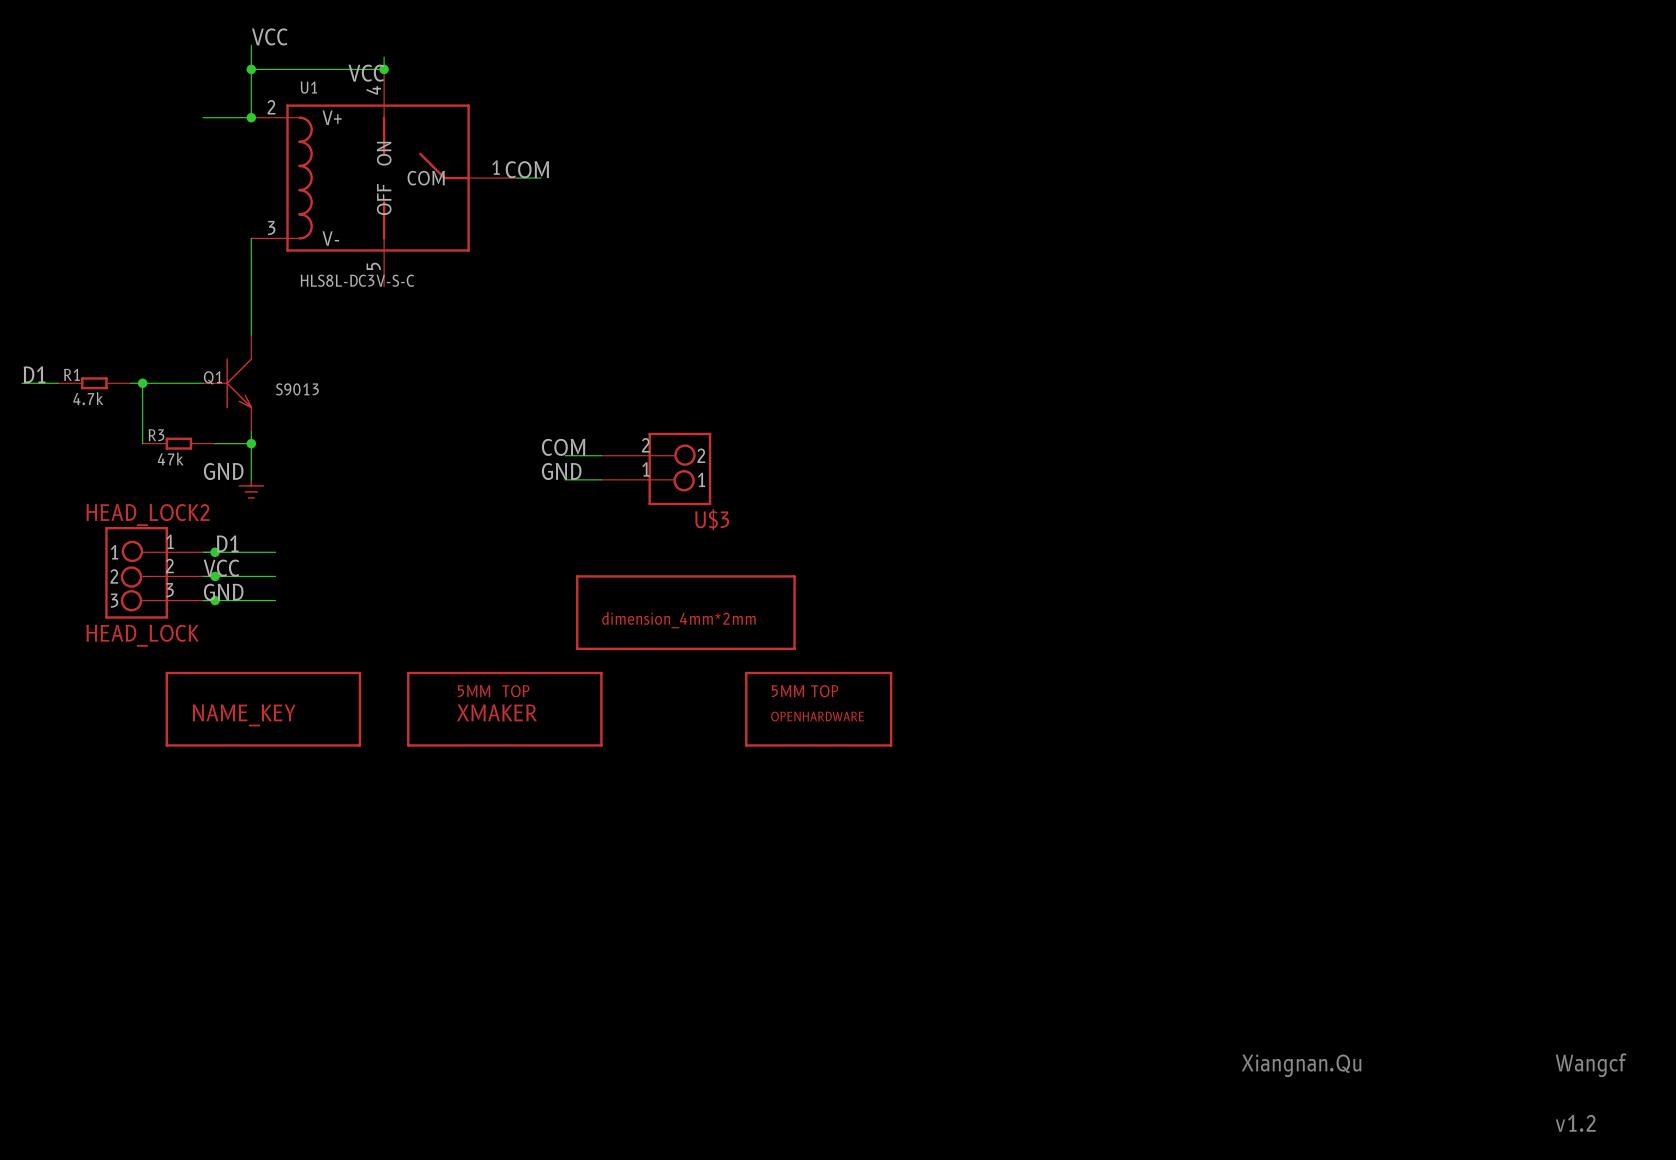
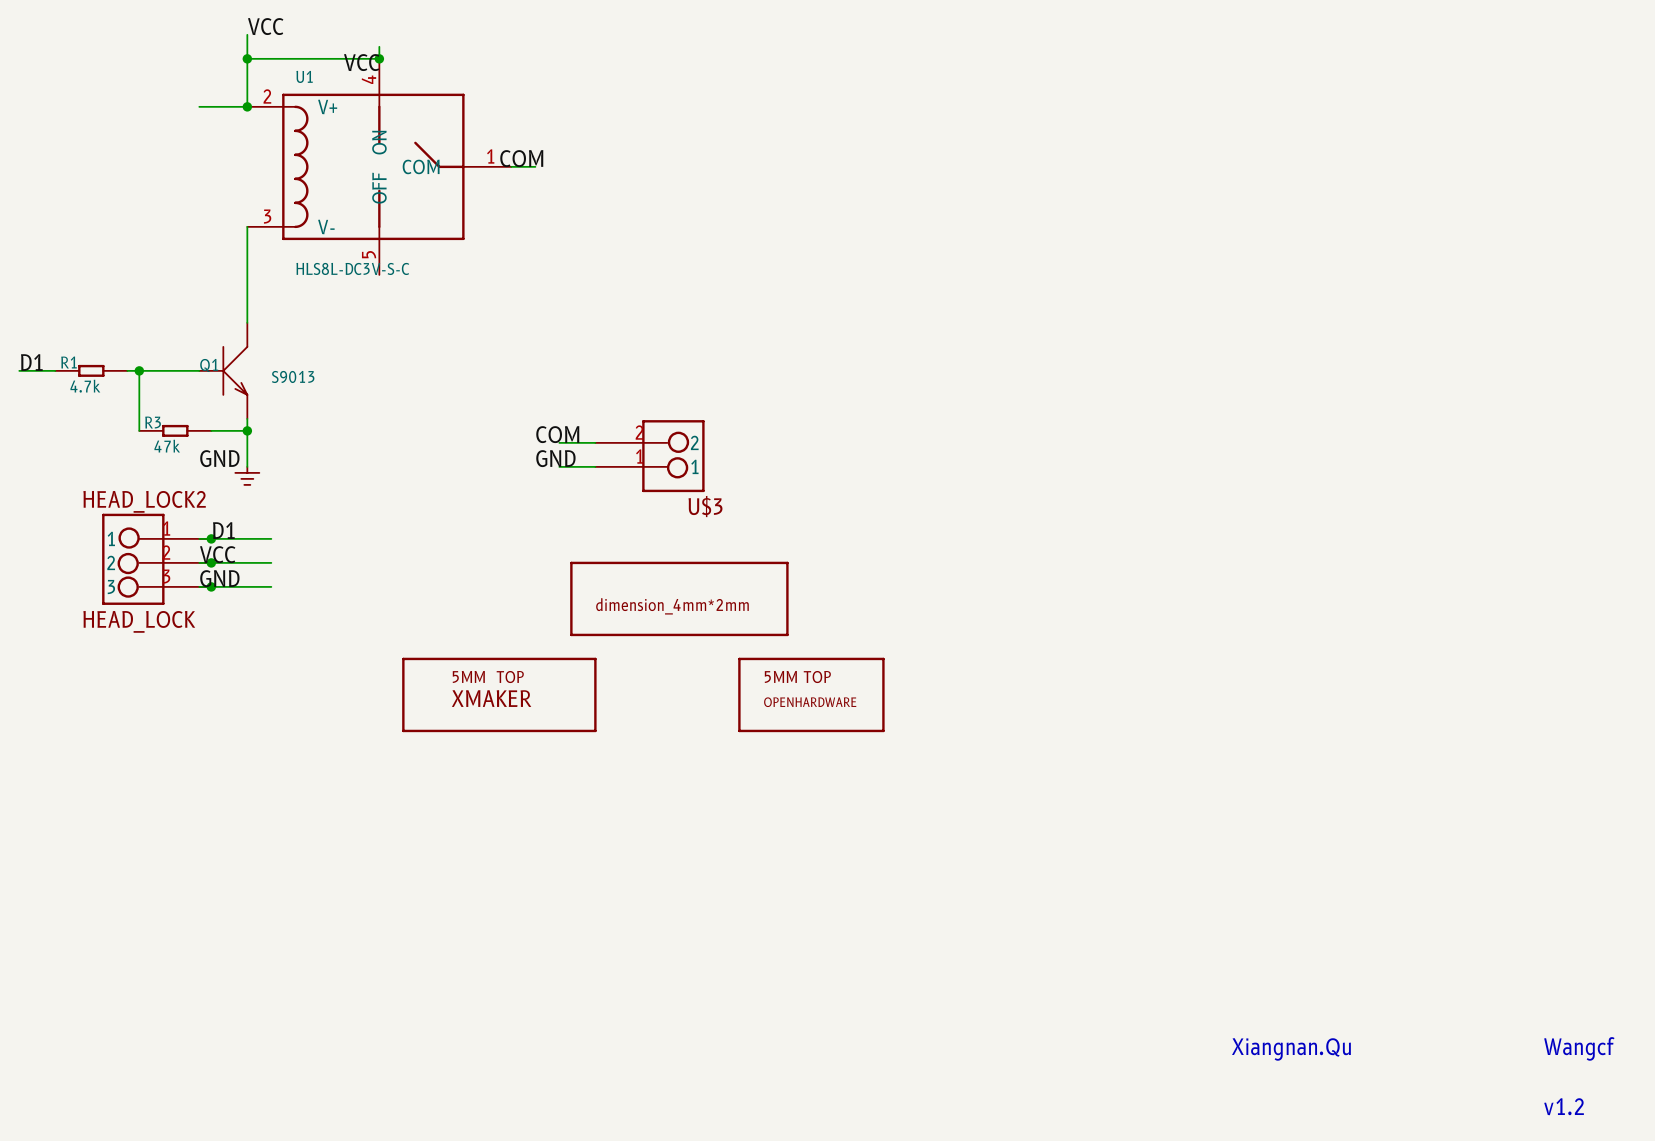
part: (263, 709) -> none

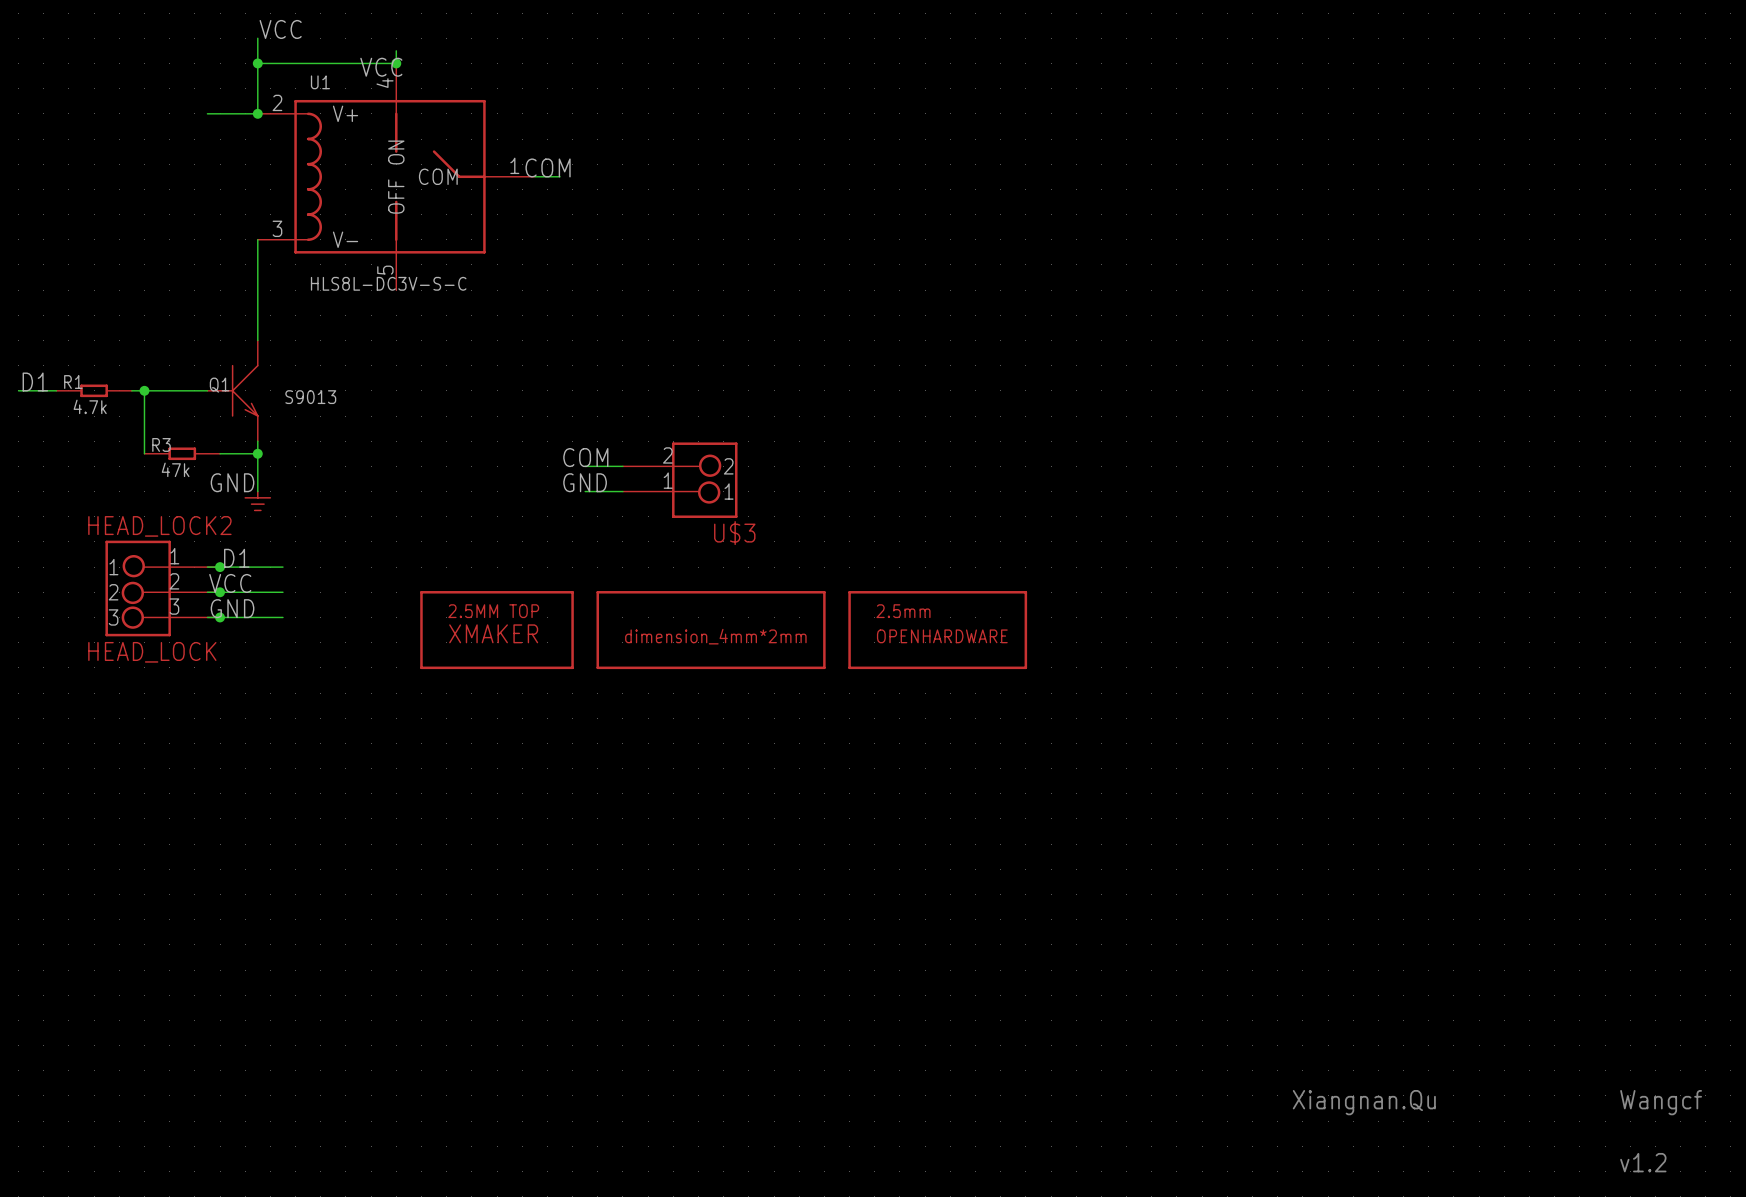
part: none -> (497, 630)
part: none -> (937, 630)
part: (499, 694) -> none
part: (811, 694) -> none

